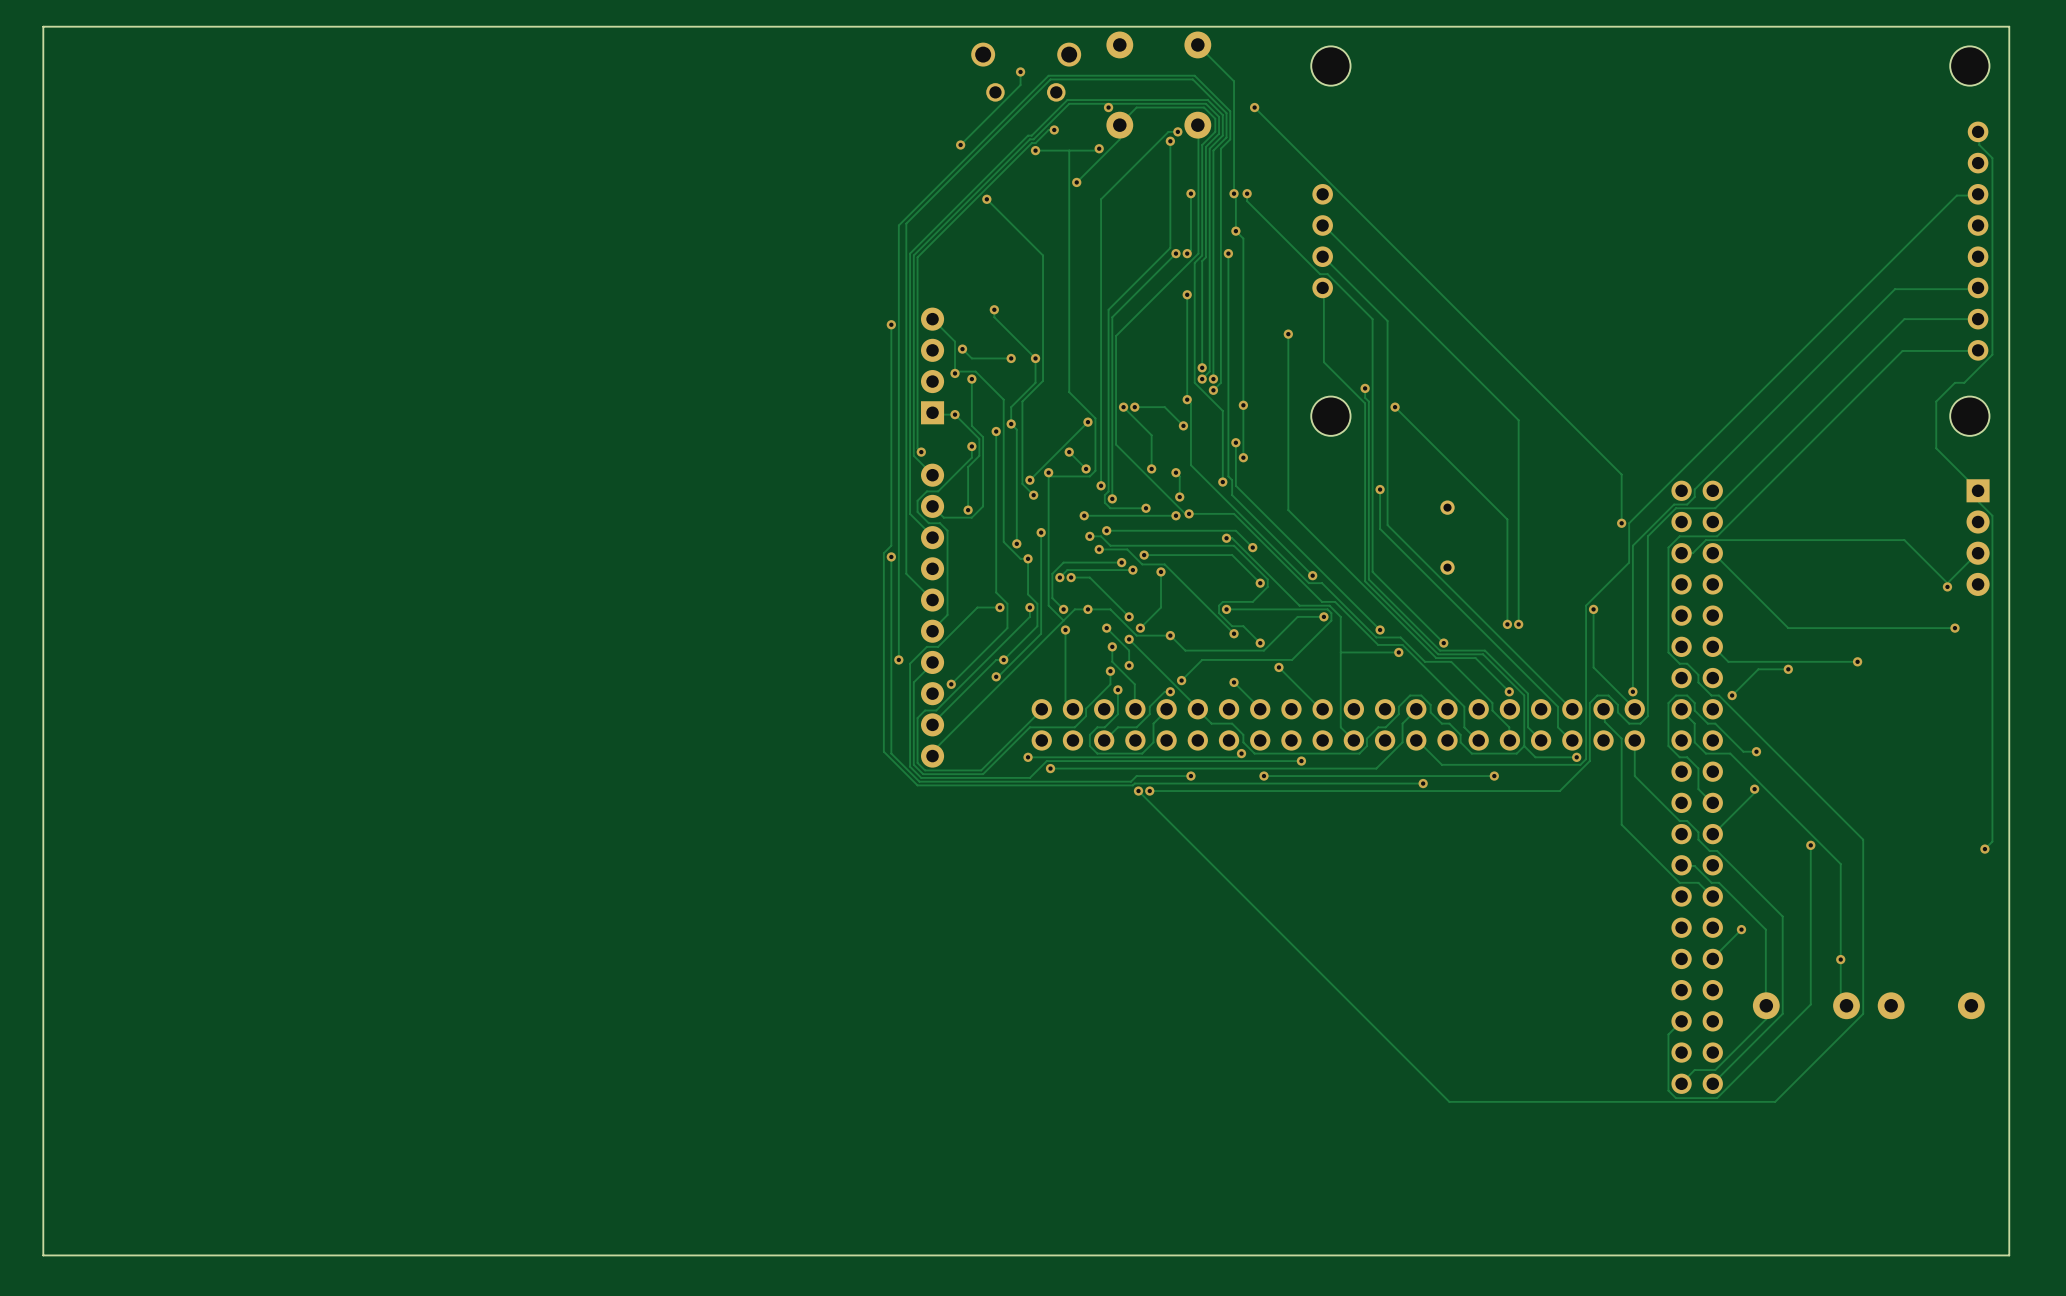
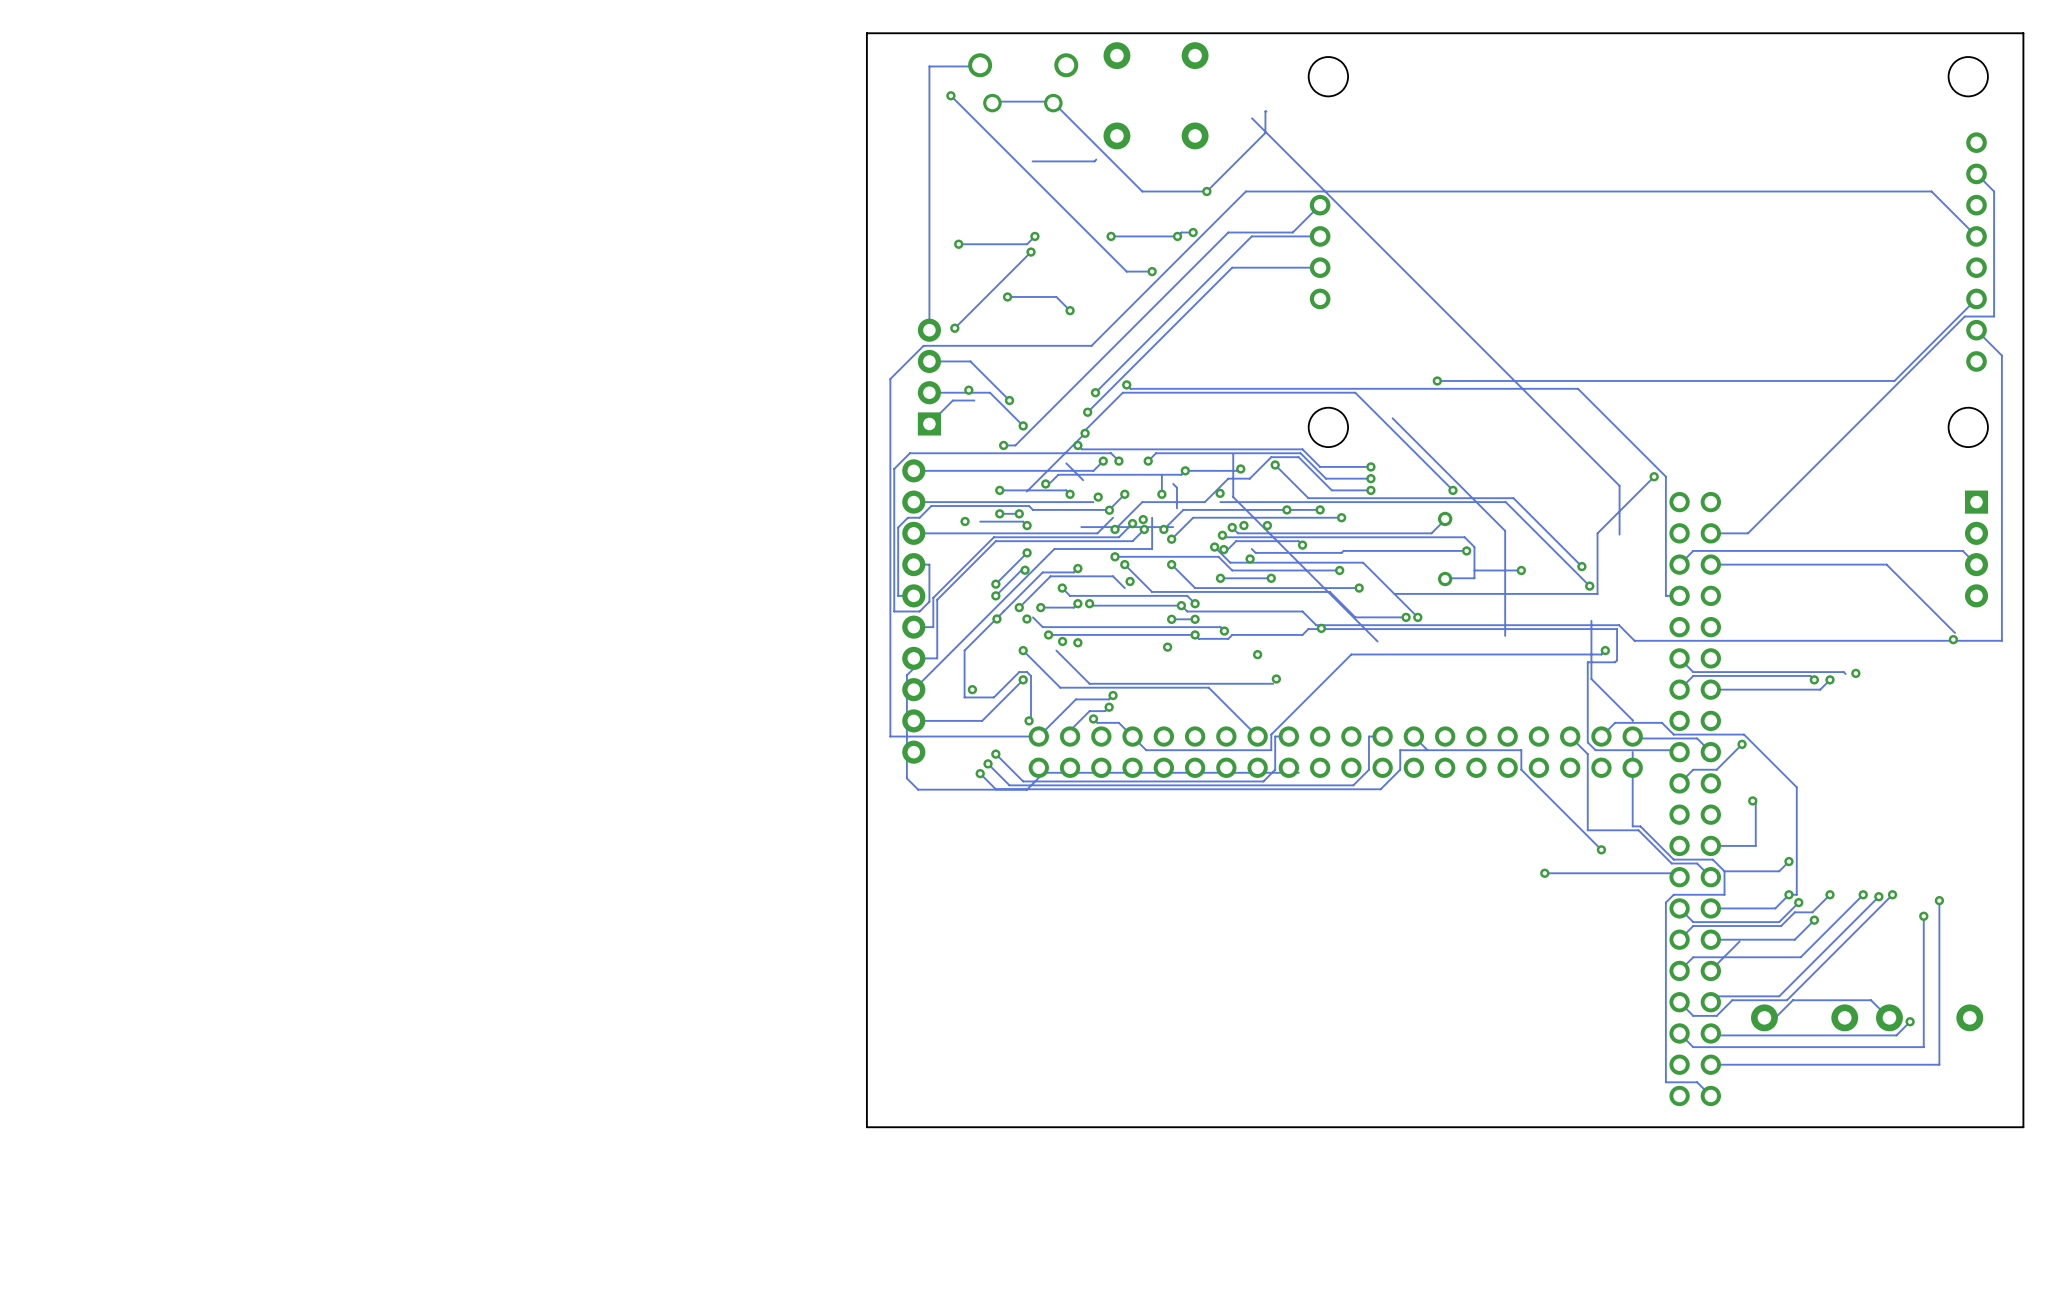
board edge: (2009, 26) (43, 26) (43, 1255) (2009, 1255) (2009, 26) -> (2023, 33) (2023, 1127) (866, 1127) (866, 33) (2023, 33)
track: (1197, 44) (1234, 81) (1235, 231) (1243, 238) (1243, 457) -> none
track: (1020, 71) (1020, 85) (960, 144) -> none
via: (1020, 71) -> none
track: none -> (950, 95) (1126, 271) (1152, 271)
via: none -> (950, 95)
track: none -> (992, 103) (1052, 101) (1142, 191) (1206, 191) (1265, 132) (1266, 111)
via: (1108, 107) -> none
via: (1254, 107) -> none
track: (1197, 125) (1198, 253) (1116, 335) (1116, 444) (1185, 513) (1234, 513) (1322, 601) (1335, 601) (1378, 644) (1402, 644) (1464, 706) (1464, 727) (1478, 740) -> none
track: (1054, 130) (1048, 130) (1035, 143) (1031, 143) (917, 257) (917, 448) (921, 452) -> none
via: (1054, 130) -> none
track: (1177, 131) (1168, 131) (1101, 199) (1101, 485) -> none
via: (1177, 131) -> none
track: (1978, 131) (1979, 144) (1992, 158) (1992, 354) (1964, 382) (1954, 382) (1936, 401) (1936, 448) (1979, 491) (1979, 502) (1992, 515) (1992, 841) (1984, 849) -> none
track: (1170, 141) (1170, 247) (1108, 309) (1108, 491) (1104, 495) (1104, 502) (1110, 508) (1146, 508) -> none
via: (1170, 141) -> none
via: (960, 144) -> none
via: (1099, 148) -> none
via: (1035, 150) -> none
track: (1069, 150) (1069, 392) (1095, 418) (1095, 470) (1089, 476) (1048, 476) -> none
track: none -> (1976, 173) (1994, 191) (1994, 316) (1964, 316) (1747, 533) (1710, 533)
via: none -> (1206, 191)
track: (1076, 182) (1119, 139) (1119, 124) (1136, 107) (1204, 107) (1215, 118) (1215, 131) (1202, 144) (1202, 255) (1194, 262) (1194, 382) (1222, 410) (1222, 482) -> none
via: (1076, 182) -> none
track: (1190, 193) (1190, 249) (1187, 253) -> none
via: (1190, 193) -> none
via: (1234, 193) -> none
track: (1247, 193) (1247, 201) (1320, 274) (1327, 274) (1372, 319) (1372, 571) (1443, 643) -> none
via: (1247, 193) -> none
track: none -> (1320, 205) (1292, 232) (1228, 232) (1015, 445) (1003, 445)
track: (1978, 194) (1956, 195) (1629, 523) (1629, 562) (1586, 605) (1586, 759) (1580, 764) (1441, 764) (1416, 740) -> none
track: (986, 199) (1043, 255) (1043, 380) (1022, 401) (1022, 483) (1033, 495) -> none
via: (986, 199) -> none
track: none -> (1193, 232) (1181, 232) (1177, 236) (1111, 236)
via: none -> (1193, 232)
track: none -> (1034, 236) (1027, 244) (958, 244)
via: none -> (1034, 236)
via: none -> (1111, 236)
via: none -> (1177, 236)
track: (1322, 225) (1518, 420) (1518, 624) -> (1320, 236) (1251, 236) (1095, 392)
track: none -> (1976, 236) (1931, 191) (1245, 191) (1091, 345) (923, 345) (890, 379) (890, 736) (1038, 736) (1075, 699) (1109, 699) (1113, 695)
via: (1235, 231) -> none
via: none -> (958, 244)
track: none -> (1031, 252) (954, 328)
via: none -> (1031, 252)
track: (1175, 253) (1112, 317) (1112, 498) -> none
via: (1175, 253) -> none
via: (1187, 253) -> none
track: (1228, 253) (1228, 476) (1232, 480) (1232, 495) (1312, 575) -> none
via: (1228, 253) -> none
track: (1322, 256) (1387, 321) (1387, 525) (1572, 709) -> (1320, 267) (1232, 267) (1087, 412)
via: none -> (1152, 271)
track: none -> (1007, 296) (1056, 296) (1070, 310)
via: none -> (1007, 296)
track: (1322, 287) (1323, 362) (1365, 403) (1365, 581) (1438, 654) (1483, 654) (1524, 695) (1524, 746) -> none
track: (1978, 287) (1895, 289) (1694, 489) (1694, 497) (1687, 504) (1674, 504) (1632, 545) (1632, 691) -> (1976, 298) (1894, 380) (1437, 380)
track: (1187, 294) (1187, 399) (1190, 403) (1190, 465) (1308, 583) (1322, 583) (1376, 637) (1400, 637) (1425, 661) (1451, 661) (1492, 703) (1492, 710) (1509, 727) (1509, 740) -> none
via: (1187, 294) -> none
via: none -> (1070, 310)
track: (994, 309) (994, 317) (1035, 358) (1035, 382) (1011, 407) (1011, 424) (1016, 429) (1016, 543) -> none
via: (994, 309) -> none
via: none -> (954, 328)
track: (932, 319) (955, 341) (955, 373) -> (929, 330) (929, 66) (980, 65)
track: (1978, 319) (1904, 319) (1715, 508) (1675, 508) (1647, 536) (1647, 716) (1640, 723) (1629, 723) (1617, 712) (1617, 704) (1608, 695) (1597, 695) (1589, 703) (1589, 761) (1559, 791) (1149, 791) -> (1976, 330) (2001, 355) (2001, 640) (1634, 640) (1619, 625) (1316, 625) (1302, 611) (1187, 611) (1181, 605) (1091, 605) (1089, 603)
track: (891, 324) (891, 545) (883, 553) (883, 751) (917, 785) (1423, 783) -> none
via: (891, 324) -> none
track: (1288, 334) (1288, 510) (1436, 658) (1475, 658) (1509, 691) -> none
via: (1288, 334) -> none
track: (962, 349) (971, 358) (1011, 358) -> none
via: (962, 349) -> none
track: none -> (929, 361) (970, 361) (1009, 400)
track: (1978, 350) (1902, 350) (1717, 536) (1679, 536) (1668, 547) (1668, 652) (1679, 663) (1687, 663) (1698, 674) (1698, 682) (1711, 695) (1719, 695) (1863, 839) (1863, 1013) (1775, 1101) (1449, 1101) (1138, 791) -> none
via: (1011, 358) -> none
via: (1035, 358) -> none
track: (1202, 367) (1202, 261) (1205, 257) (1205, 146) (1219, 133) (1219, 116) (1205, 103) (1069, 103) (1033, 139) (1029, 139) (913, 255) (913, 455) (932, 475) -> none
via: (1202, 367) -> none
via: none -> (1437, 380)
track: (955, 371) (975, 371) (1003, 399) (1003, 541) (1020, 558) (1028, 558) (1028, 594) (1037, 603) (1037, 626) (1003, 659) (996, 659) (932, 724) -> none
via: (955, 373) -> none
track: none -> (1126, 384) (1130, 388) (1577, 388) (1665, 476) (1665, 595) (1679, 595)
via: none -> (1126, 384)
track: (971, 379) (971, 425) (983, 437) (983, 506) (971, 517) (943, 517) (932, 506) -> none
track: (1202, 379) (1209, 371) (1209, 148) (1222, 135) (1222, 115) (1207, 100) (1067, 100) (1031, 135) (1028, 135) (910, 253) (910, 513) (932, 537) -> none
via: (1202, 379) -> none
track: (1213, 379) (1213, 150) (1226, 137) (1226, 113) (1192, 79) (1050, 79) (906, 223) (906, 573) (932, 600) -> none
via: (1213, 379) -> none
track: none -> (929, 392) (989, 392) (1023, 425)
via: none -> (1095, 392)
track: (1365, 388) (1365, 397) (1368, 401) (1368, 579) (1440, 650) (1484, 650) (1528, 693) (1528, 727) (1541, 740) -> none
via: (1365, 388) -> none
via: none -> (1009, 400)
track: (1213, 390) (1220, 382) (1220, 148) (1230, 139) (1230, 111) (1194, 75) (1048, 75) (898, 225) (898, 659) -> none
via: (1213, 390) -> none
via: (1187, 399) -> none
via: none -> (1087, 412)
via: (1243, 405) -> none
track: (1123, 407) (1151, 435) (1151, 468) -> none
via: (1123, 407) -> none
track: (1134, 407) (1164, 407) (1183, 425) -> none
via: (1134, 407) -> none
via: (1395, 407) -> none
track: (932, 412) (934, 414) (955, 414) (979, 438) (979, 455) (968, 467) (968, 510) -> (929, 423) (952, 400) (974, 400)
via: (955, 414) -> none
via: none -> (1023, 425)
track: none -> (1081, 433) (1122, 392) (1355, 392) (1452, 490)
via: (1011, 424) -> none
via: (1183, 425) -> none
track: (996, 431) (996, 592) (1007, 603) (1007, 628) (951, 684) -> none
via: (996, 431) -> none
via: none -> (1003, 445)
track: none -> (1077, 445) (1081, 449) (1302, 449) (1320, 466) (1370, 466)
via: none -> (1077, 445)
via: (1235, 442) -> none
track: (971, 446) (971, 457) (938, 491) (926, 491) (917, 500) (917, 512) (928, 523) (940, 523) (947, 530) (947, 615) (932, 631) -> none
via: (971, 446) -> none
track: none -> (1103, 461) (1093, 470) (913, 470)
via: none -> (1103, 461)
track: none -> (1118, 461) (1111, 453) (909, 453) (894, 468) (894, 611) (919, 611) (929, 601) (929, 564) (913, 564)
via: none -> (1118, 461)
track: none -> (1148, 461) (1156, 453) (1300, 453) (1325, 478) (1370, 478)
via: none -> (1148, 461)
via: (921, 452) -> none
via: (1069, 452) -> none
track: none -> (1275, 464) (1308, 498) (1513, 498) (1581, 566)
via: none -> (1275, 464)
via: none -> (1370, 466)
via: none -> (1185, 470)
track: none -> (1240, 470) (1185, 470) (1181, 474) (1058, 474) (1050, 482)
track: none -> (1161, 474) (1161, 494)
track: none -> (1654, 476) (1597, 533) (1597, 593) (1394, 593)
via: none -> (1654, 476)
via: none -> (1370, 478)
via: (1086, 468) -> none
via: (1151, 468) -> none
track: (1048, 472) (1048, 605) (1063, 620) -> none
via: (1175, 472) -> none
track: none -> (999, 490) (1066, 490) (1070, 494)
via: none -> (999, 490)
track: none -> (1370, 490) (1331, 490) (1298, 457) (1271, 457) (1249, 478) (1228, 478) (1204, 502) (1142, 502) (1115, 529)
via: none -> (1370, 490)
via: none -> (1452, 490)
via: (1029, 480) -> none
via: none -> (1070, 494)
track: none -> (1124, 494) (1109, 509) (1032, 509) (1029, 506) (931, 506) (919, 517) (907, 517) (898, 527) (898, 595) (913, 595)
via: none -> (1124, 494)
via: none -> (1161, 494)
track: (1380, 489) (1380, 528) (1557, 706) (1557, 727) (1572, 740) -> none
via: (1380, 489) -> none
track: none -> (1093, 502) (913, 502)
track: none -> (1220, 502) (1505, 502) (1589, 586)
via: (1033, 495) -> none
via: (1179, 497) -> none
via: none -> (1286, 509)
track: none -> (1320, 509) (1183, 509) (1163, 529)
via: none -> (1320, 509)
via: none -> (999, 513)
track: none -> (1019, 513) (999, 513)
via: none -> (1019, 513)
track: none -> (1113, 517) (1097, 533) (913, 533)
track: none -> (1152, 517) (1152, 548) (1054, 548) (913, 689)
track: none -> (1341, 517) (1193, 517) (1171, 539)
via: none -> (1341, 517)
track: none -> (1445, 518) (1431, 533) (1238, 533) (1232, 527)
track: none -> (980, 521) (1023, 521) (1027, 525)
track: none -> (1132, 523) (1118, 537) (993, 537) (933, 597) (933, 627) (913, 627)
via: none -> (1132, 523)
via: (1189, 513) -> none
via: none -> (1027, 525)
via: none -> (1243, 525)
via: none -> (1267, 525)
via: (1084, 515) -> none
via: (1175, 515) -> none
via: none -> (1232, 527)
via: none -> (1115, 529)
via: none -> (1144, 529)
via: none -> (1163, 529)
track: none -> (1222, 535) (1224, 537) (1464, 537) (1474, 547) (1474, 578) (1445, 579)
via: none -> (1222, 535)
via: (1621, 523) -> none
via: none -> (1171, 539)
track: (1106, 530) (1235, 530) (1252, 547) -> none
via: (1106, 530) -> none
track: (1041, 532) (1041, 633) (996, 676) -> none
via: (1041, 532) -> none
track: none -> (1302, 545) (1298, 541) (1236, 541) (1228, 548)
via: none -> (1302, 545)
track: none -> (1214, 547) (1230, 562) (1363, 562) (1417, 617)
via: none -> (1214, 547)
track: (1089, 536) (1101, 536) (1110, 545) (1234, 545) (1267, 579) (1267, 586) (1252, 601) (1222, 601) (1219, 605) (1219, 613) (1232, 626) (1243, 626) (1260, 643) -> none
via: (1089, 536) -> none
track: none -> (1251, 548) (1255, 552) (1466, 550)
track: (1226, 538) (1232, 538) (1299, 605) (1329, 605) (1340, 616) (1340, 727) (1353, 740) -> none
via: none -> (1466, 550)
track: none -> (1027, 552) (995, 584)
via: none -> (1027, 552)
via: (1016, 543) -> none
track: none -> (1115, 556) (1218, 556) (1232, 570) (1339, 570)
via: none -> (1115, 556)
track: (1099, 549) (1127, 549) (1142, 564) (1164, 564) (1234, 633) -> none
via: (1099, 549) -> none
track: none -> (1124, 564) (1152, 591) (1329, 591) (1355, 617) (1406, 617)
via: none -> (1124, 564)
track: none -> (1171, 564) (1195, 588) (1359, 588)
via: none -> (1171, 564)
track: (1681, 553) (1692, 553) (1705, 540) (1904, 540) (1947, 583) -> (1679, 564) (1693, 550) (1962, 550) (1976, 564)
track: (1713, 553) (1788, 628) (1954, 628) -> (1711, 564) (1886, 564) (1955, 632)
track: (1978, 553) (1947, 583) -> none
track: (1144, 555) (1232, 555) (1260, 583) -> none
via: (1144, 555) -> none
via: none -> (1581, 566)
track: (891, 556) (891, 753) (919, 781) (1131, 781) (1136, 776) (1190, 776) -> none
via: (891, 556) -> none
track: none -> (1077, 568) (1073, 572) (1042, 572) (964, 650) (964, 697) (993, 697) (1019, 672) (1027, 672) (1031, 675) (1031, 720) (1029, 720)
via: none -> (1077, 568)
track: none -> (1021, 570) (995, 595)
via: none -> (1339, 570)
track: none -> (1521, 570) (1474, 570)
via: none -> (1521, 570)
track: (1121, 562) (1063, 562) (1052, 573) (1052, 598) (1063, 609) -> none
via: (1121, 562) -> none
via: none -> (1220, 578)
track: none -> (1271, 578) (1220, 578)
via: none -> (1271, 578)
track: (1132, 570) (1067, 570) (1059, 577) -> none
track: (1160, 571) (1160, 607) (1140, 628) -> none
via: (1160, 571) -> none
via: none -> (995, 584)
via: none -> (1589, 586)
via: (1312, 575) -> none
track: none -> (1062, 588) (1070, 595) (1187, 595) (1195, 603)
via: none -> (1062, 588)
track: none -> (1124, 588) (1113, 576) (1050, 576) (1019, 607)
via: none -> (1359, 588)
via: (1059, 577) -> none
track: (1071, 577) (1089, 577) (1129, 616) -> none
via: (1071, 577) -> none
via: (1260, 583) -> none
via: none -> (995, 595)
via: (1947, 586) -> none
track: none -> (1077, 603) (1073, 607) (1040, 607)
via: none -> (1077, 603)
via: none -> (1089, 603)
via: none -> (1195, 603)
via: none -> (1181, 605)
via: none -> (1019, 607)
via: none -> (1040, 607)
track: none -> (1032, 617) (1042, 627) (1220, 627) (1224, 631)
via: none -> (1406, 617)
via: none -> (1417, 617)
track: (999, 607) (977, 607) (938, 646) -> (1144, 529) (1132, 541) (995, 541) (937, 599) (937, 658) (935, 658)
track: (1029, 607) (1029, 616) (936, 710) (925, 710) (917, 718) (917, 762) (925, 770) (981, 770) (1041, 709) -> none
via: none -> (1171, 619)
track: none -> (1195, 619) (1171, 619)
via: none -> (1195, 619)
via: (1063, 609) -> none
via: (1087, 609) -> none
track: (1226, 609) (1327, 609) (1331, 613) (1331, 620) (1292, 659) (1202, 659) (1181, 680) -> none
via: (1226, 609) -> none
via: (1593, 609) -> none
part position: (932, 615) -> (913, 611)
via: (1129, 616) -> none
track: (1323, 616) (1297, 616) (1263, 650) (1185, 650) (1170, 635) (1136, 635) (1110, 609) (1074, 609) (932, 751) (932, 756) -> none
via: none -> (1224, 631)
track: none -> (1048, 634) (1195, 634) (1199, 638) (1228, 638) (1232, 634) (1302, 634) (1308, 629) (1617, 629) (1617, 660) (1615, 662) (1587, 662) (1587, 742) (1595, 750) (1677, 750) (1679, 752)
via: none -> (1048, 634)
via: none -> (1195, 634)
via: (1507, 624) -> none
via: (1518, 624) -> none
track: (1106, 628) (1129, 650) (1129, 665) -> none
via: (1106, 628) -> none
via: (1140, 628) -> none
track: (1065, 629) (1065, 701) (1072, 709) -> none
via: (1380, 629) -> none
via: none -> (1077, 642)
via: (1234, 633) -> none
track: none -> (1023, 650) (1060, 687) (1208, 687) (1257, 736)
via: none -> (1023, 650)
track: none -> (1056, 650) (1089, 683) (1273, 683)
track: (1129, 639) (1211, 723) (1232, 723) (1243, 734) (1243, 742) (1254, 753) (1359, 753) (1366, 746) (1366, 738) (1378, 727) (1385, 727) (1398, 714) (1398, 706) (1410, 695) (1421, 695) (1430, 704) (1430, 712) (1441, 723) (1449, 723) (1460, 734) (1460, 742) (1471, 753) (1516, 753) (1524, 746) -> none
via: (1129, 639) -> none
track: none -> (1605, 650) (1601, 654) (1351, 654) (1271, 734) (1271, 750) (1146, 750) (1118, 722) (1097, 722) (1093, 718)
via: none -> (1605, 650)
via: (1443, 643) -> none
track: (1112, 646) (1112, 661) (1134, 684) (1135, 709) -> none
via: (1112, 646) -> none
track: none -> (1679, 658) (1693, 672) (1843, 672) (1845, 674)
track: (1712, 646) (1728, 661) (1857, 661) -> none
track: (1398, 652) (1340, 652) -> none
via: (1398, 652) -> none
via: (898, 659) -> none
via: (1003, 659) -> none
track: (932, 662) (913, 682) (913, 764) (923, 774) (983, 774) (1029, 727) (1074, 727) (1086, 716) (1086, 708) (1110, 684) (1110, 671) -> none
via: (1129, 665) -> none
track: (1278, 667) (1322, 709) -> none
track: none -> (1023, 679) (982, 720) (913, 720)
via: none -> (1023, 679)
track: none -> (1814, 679) (1810, 675) (1693, 675) (1679, 689)
via: none -> (1814, 679)
track: none -> (1830, 679) (1820, 689) (1710, 689)
via: none -> (1830, 679)
track: (1788, 669) (1758, 669) (1732, 695) -> none
via: (1788, 669) -> none
via: (1110, 671) -> none
via: (996, 676) -> none
via: none -> (972, 689)
via: (1181, 680) -> none
track: (1234, 682) (1260, 709) -> none
via: (1234, 682) -> none
via: none -> (1113, 695)
via: (951, 684) -> none
track: (1117, 689) (1117, 714) (1104, 727) (1097, 727) (1089, 734) (1089, 746) (1097, 753) (1142, 753) (1153, 742) (1153, 723) (1166, 709) -> none
via: (1117, 689) -> none
track: (1170, 691) (1164, 691) (1149, 706) (1149, 714) (1136, 727) (1117, 727) (1104, 740) -> none
via: (1170, 691) -> none
via: (1509, 691) -> none
via: (1632, 691) -> none
track: none -> (1109, 707) (1105, 711) (1089, 711) (1070, 730) (1070, 736)
via: none -> (1109, 707)
via: (1732, 695) -> none
via: none -> (1093, 718)
via: none -> (1029, 720)
track: (1416, 709) (1402, 723) (1402, 742) (1376, 768) (1050, 768) -> none
track: (1603, 709) (1604, 721) (1621, 738) (1621, 824) (1679, 882) (1698, 882) (1712, 896) -> (1601, 736) (1615, 722) (1661, 722) (1673, 734) (1744, 734) (1796, 787) (1796, 894) (1788, 894) (1775, 908) (1710, 908)
track: (1681, 709) (1694, 723) (1694, 742) (1705, 753) (1730, 753) (1840, 864) (1840, 998) (1846, 1005) -> none
track: none -> (1288, 736) (1275, 736) (1275, 769) (1263, 781) (1023, 781) (995, 754)
part position: (1338, 724) -> (1335, 752)
track: none -> (1382, 736) (1368, 736) (1368, 769) (1353, 785) (1009, 785) (988, 763)
track: none -> (1413, 736) (1427, 750)
track: none -> (1570, 736) (1587, 754) (1587, 830) (1638, 830) (1671, 863) (1697, 863) (1710, 877)
track: none -> (1632, 736) (1634, 738) (1697, 738) (1710, 752)
track: none -> (1742, 744) (1716, 769) (1693, 769) (1679, 783)
via: none -> (1742, 744)
via: none -> (995, 754)
track: (1524, 746) (1535, 757) (1576, 757) -> none
track: (1756, 751) (1743, 751) (1715, 723) (1707, 723) (1694, 710) (1694, 703) (1687, 695) (1675, 695) (1668, 703) (1668, 746) (1679, 757) (1687, 757) (1698, 768) (1698, 789) (1712, 802) -> none
via: (1756, 751) -> none
via: none -> (988, 763)
track: (1241, 753) (1237, 757) (1028, 757) -> none
via: (1241, 753) -> none
via: (1028, 757) -> none
via: (1576, 757) -> none
track: none -> (980, 773) (995, 789) (1380, 789) (1400, 769) (1400, 750) (1521, 750) (1521, 769) (1601, 849)
via: none -> (980, 773)
via: (1301, 761) -> none
via: (1050, 768) -> none
via: (1190, 776) -> none
via: (1263, 776) -> none
track: (1494, 776) (1263, 776) -> none
via: (1494, 776) -> none
track: (1634, 776) (1679, 820) (1687, 820) (1698, 832) (1698, 839) (1709, 850) (1717, 850) (1782, 916) (1782, 1013) (1712, 1083) -> (1724, 871) (1724, 894) (1673, 894) (1665, 902) (1665, 1082) (1697, 1082) (1710, 1095)
track: none -> (1632, 787) (1632, 826) (1640, 826) (1673, 859) (1712, 859) (1724, 871)
via: (1423, 783) -> none
track: (1754, 789) (1754, 792) (1713, 834) -> (1755, 799) (1755, 845) (1711, 845)
via: (1138, 791) -> none
via: (1149, 791) -> none
via: none -> (1601, 849)
track: (1810, 845) (1810, 1004) (1717, 1098) (1675, 1098) (1668, 1090) (1668, 1034) (1681, 1021) -> (1923, 916) (1923, 1047) (1693, 1047) (1679, 1033)
via position: (1810, 845) -> (1788, 861)
track: none -> (1788, 861) (1779, 871) (1724, 871)
via: (1984, 849) -> none
via: none -> (1544, 873)
track: (1681, 865) (1694, 865) (1711, 882) (1719, 882) (1765, 929) (1766, 1005) (1765, 1019) (1715, 1070) (1694, 1070) (1681, 1083) -> (1679, 877) (1675, 873) (1544, 873)
via: none -> (1788, 894)
track: none -> (1830, 894) (1812, 912) (1794, 912) (1781, 926) (1693, 926) (1679, 939)
via: none -> (1830, 894)
track: none -> (1863, 894) (1800, 957) (1693, 957) (1679, 970)
via: none -> (1863, 894)
track: none -> (1892, 894) (1787, 1000) (1732, 1000) (1716, 1015) (1693, 1015) (1679, 1002)
via: none -> (1892, 894)
track: none -> (1878, 896) (1779, 996) (1716, 996) (1710, 1002)
via: none -> (1878, 896)
track: none -> (1939, 900) (1939, 1064) (1710, 1064)
via: none -> (1939, 900)
track: none -> (1798, 902) (1779, 922) (1693, 922) (1679, 908)
via: none -> (1798, 902)
via: none -> (1923, 916)
track: none -> (1814, 920) (1794, 939) (1710, 939)
via: none -> (1814, 920)
via: (1741, 929) -> none
via: (1840, 959) -> none
track: none -> (1889, 1017) (1871, 1000) (1792, 1000) (1775, 1017) (1764, 1017)
track: none -> (1910, 1021) (1896, 1035) (1712, 1035) (1710, 1033)
via: none -> (1910, 1021)

